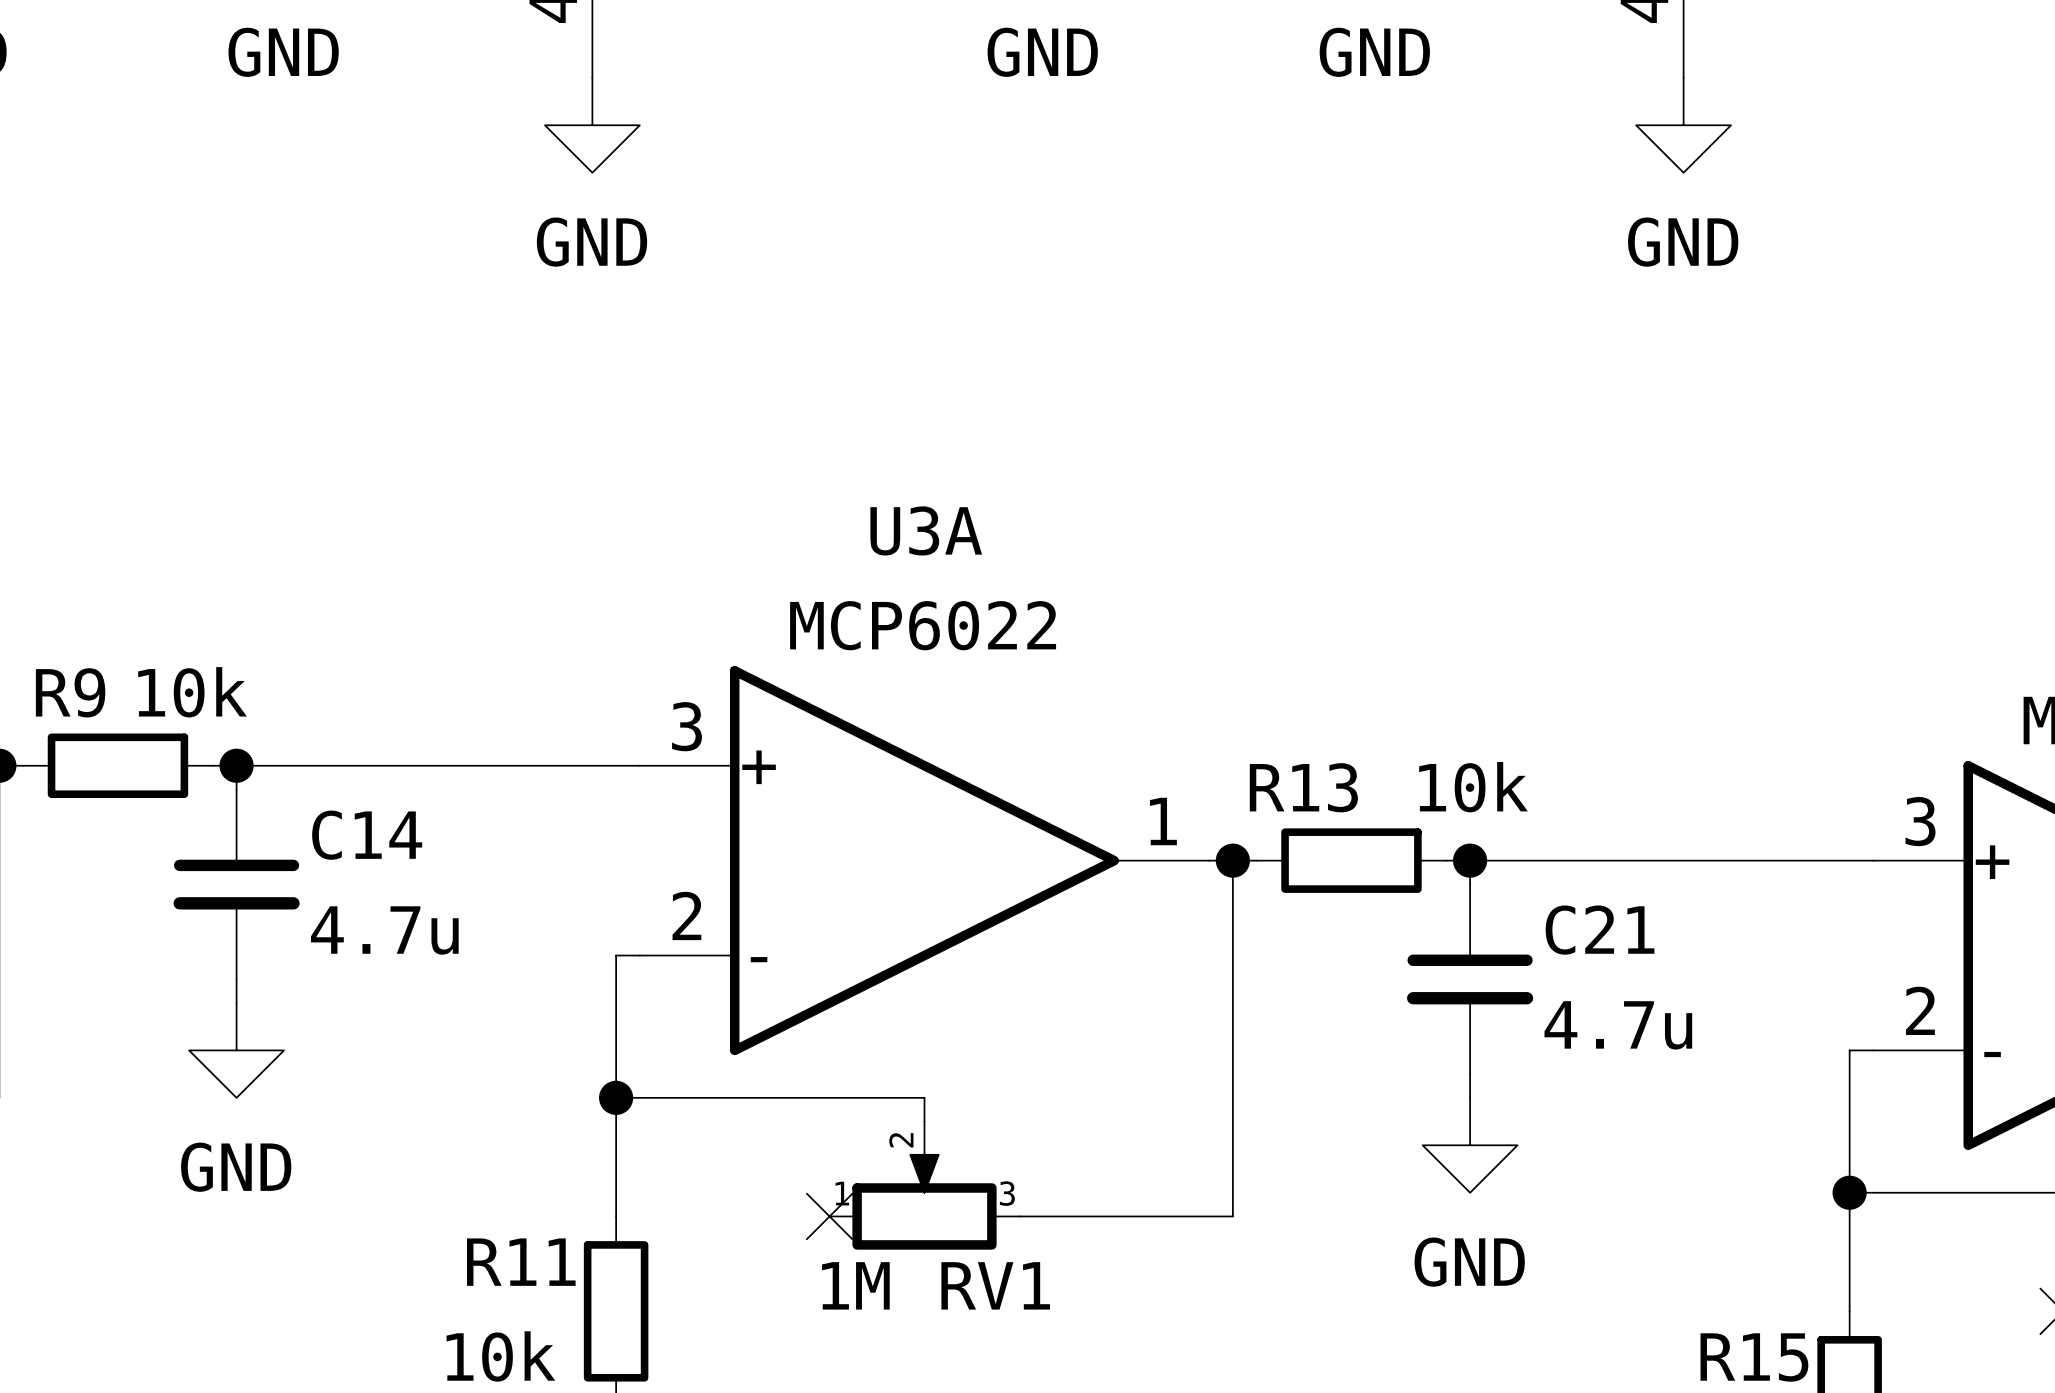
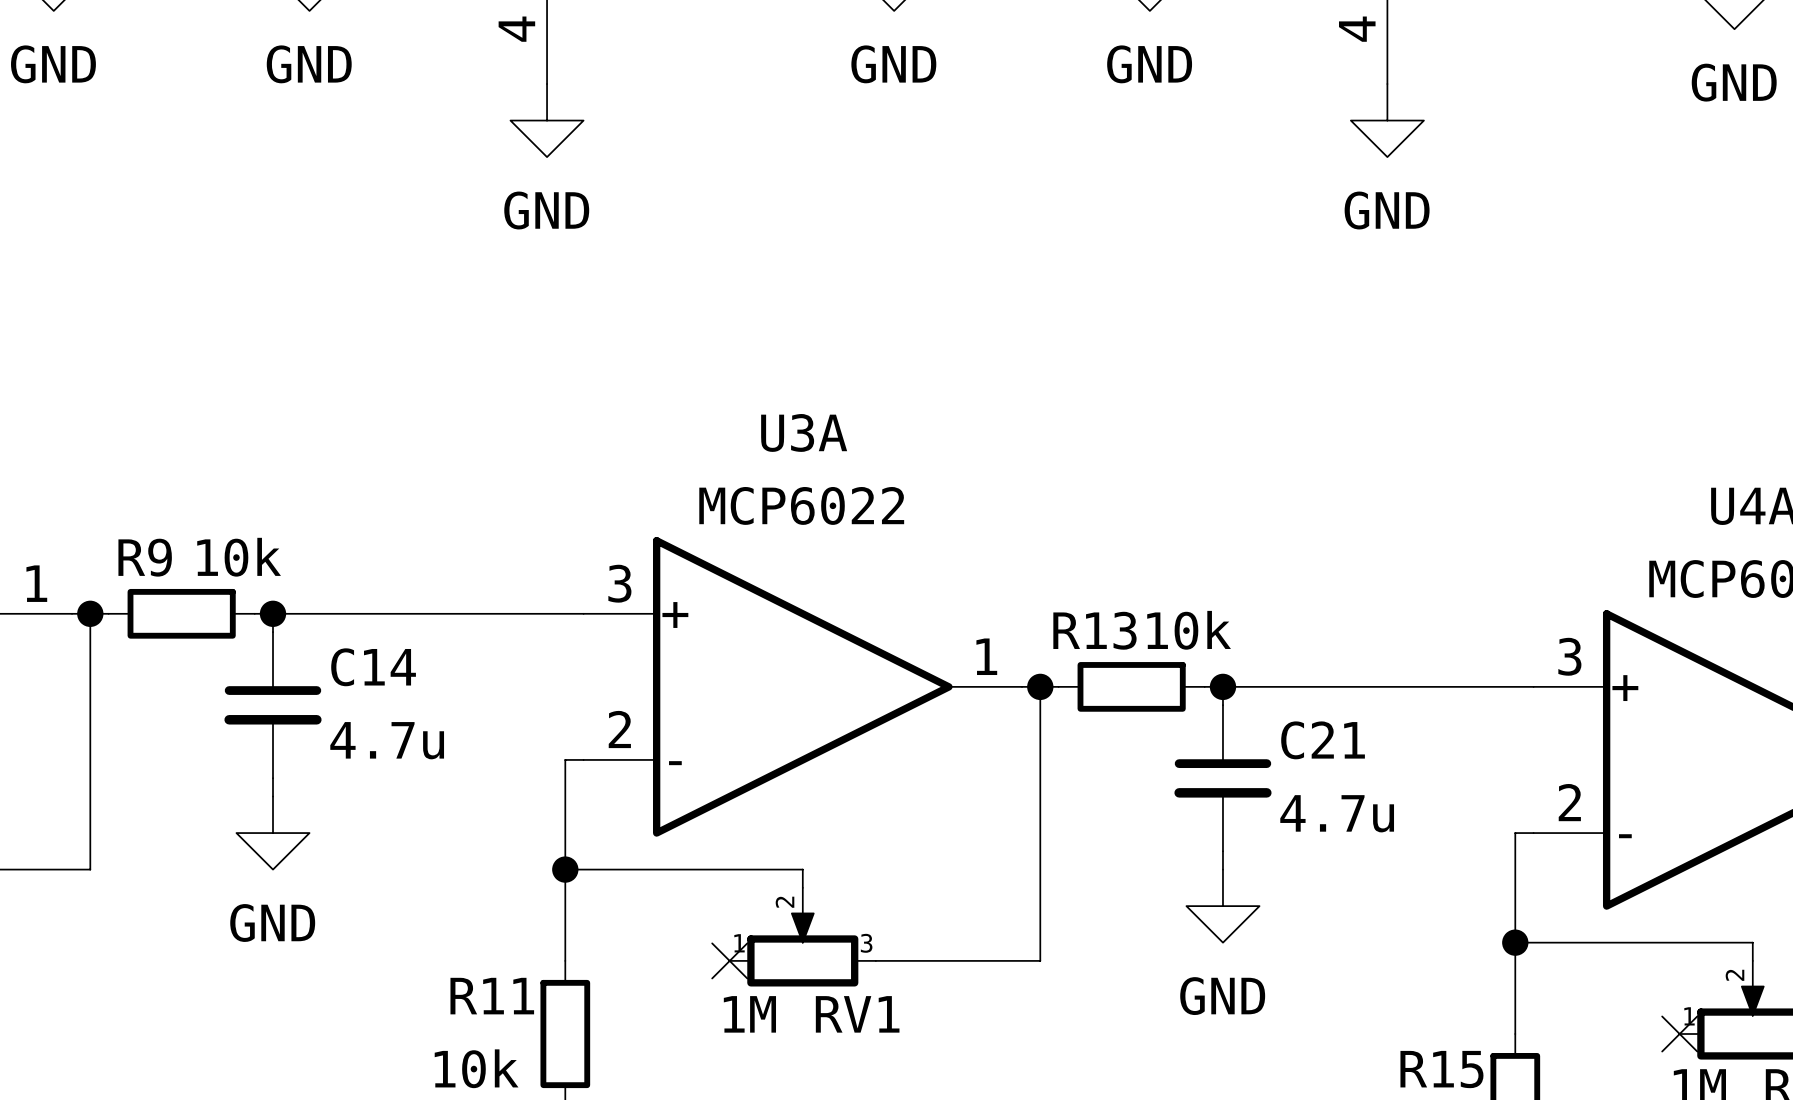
R13 value position: 10k (1473, 787) -> 10k (1189, 630)

